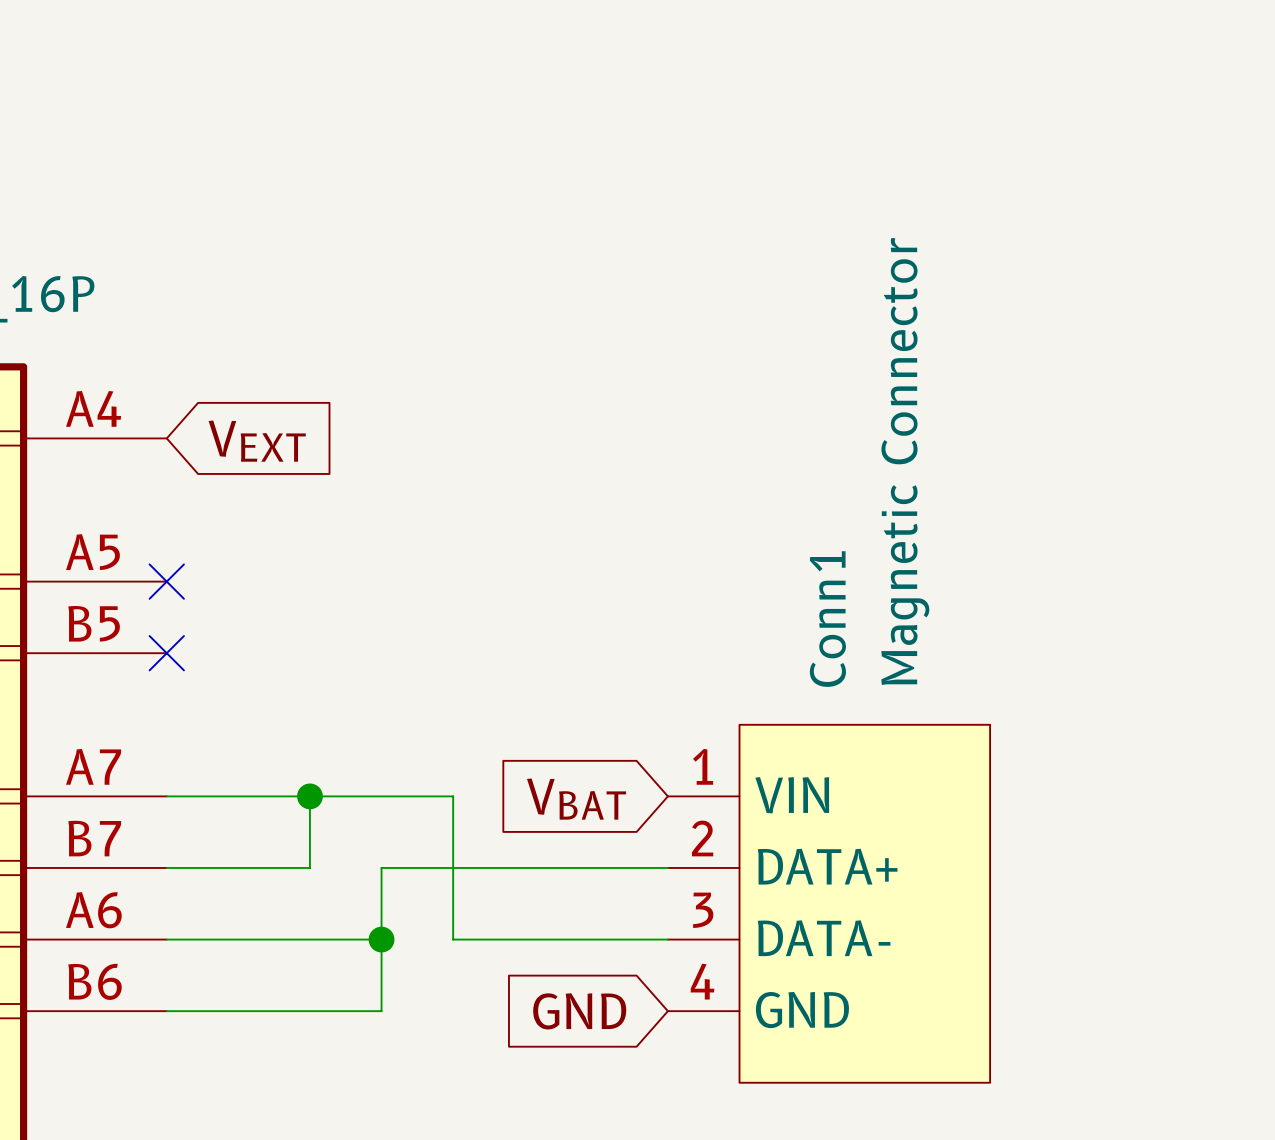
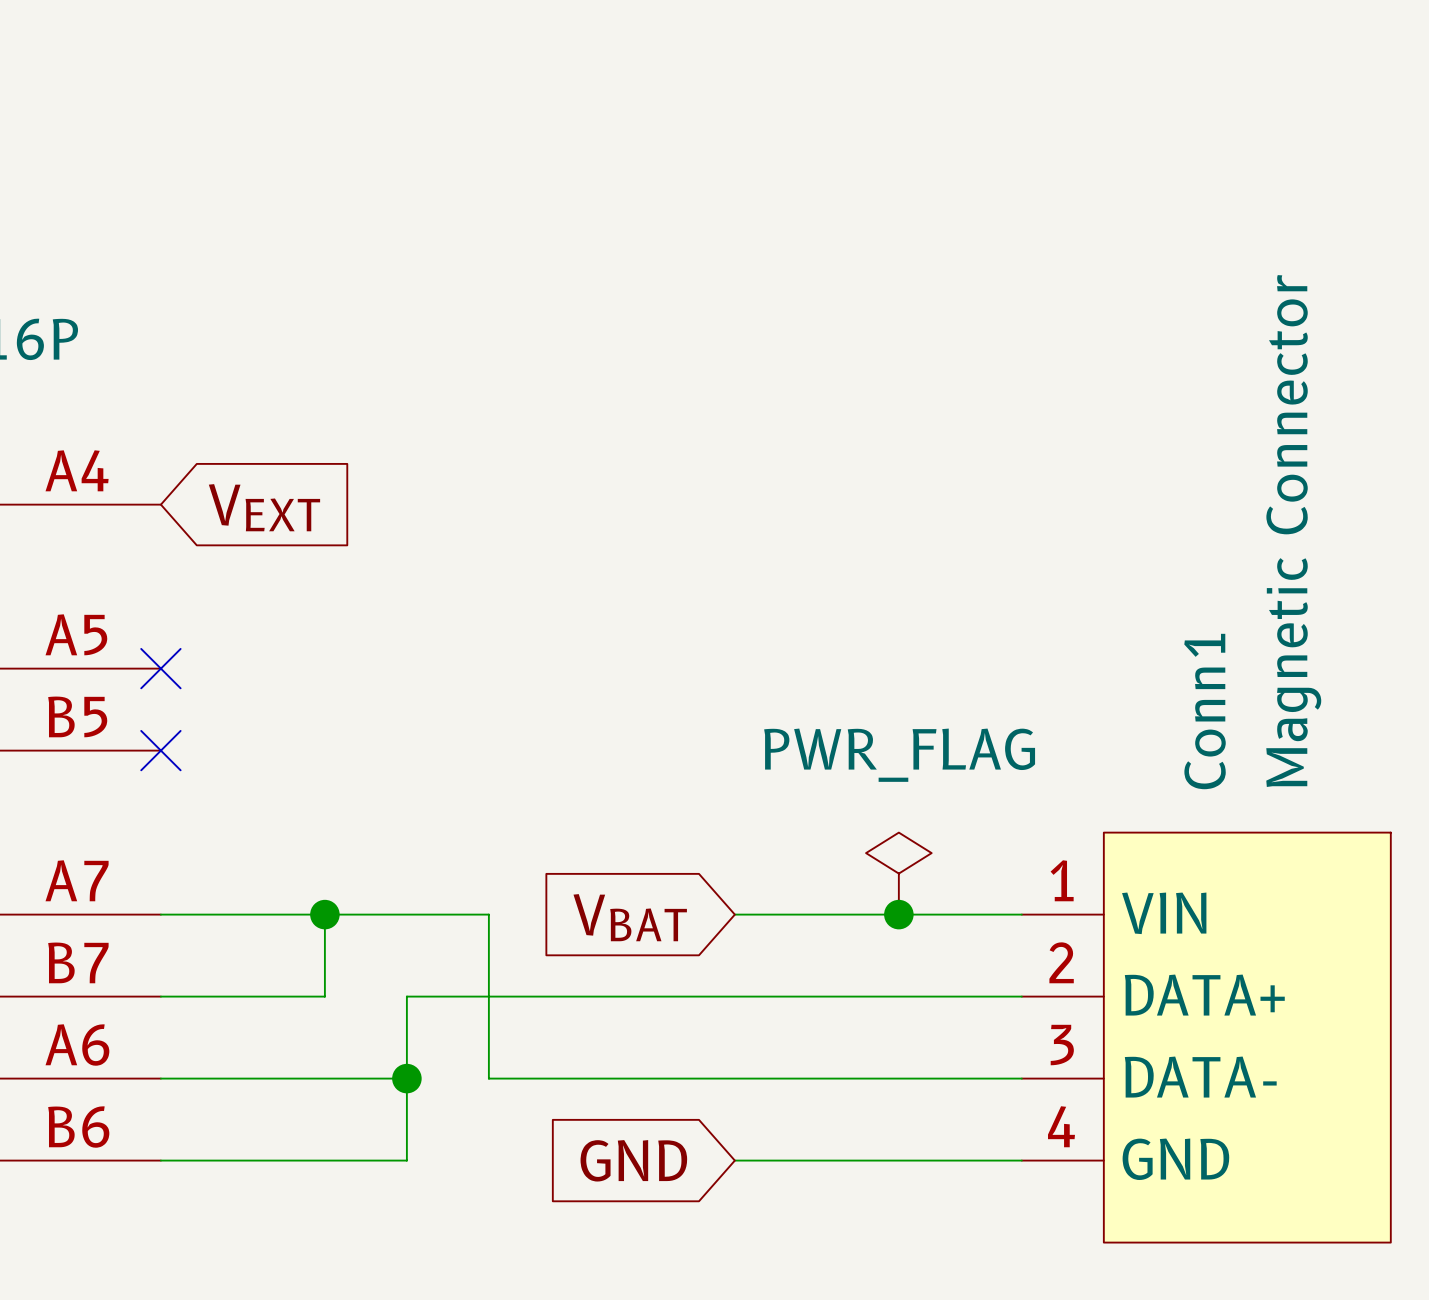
power symbol: none -> PWR_FLAG (898, 873)
junction: none -> (898, 914)
Conn1 position: (829, 903) -> (1206, 1037)

